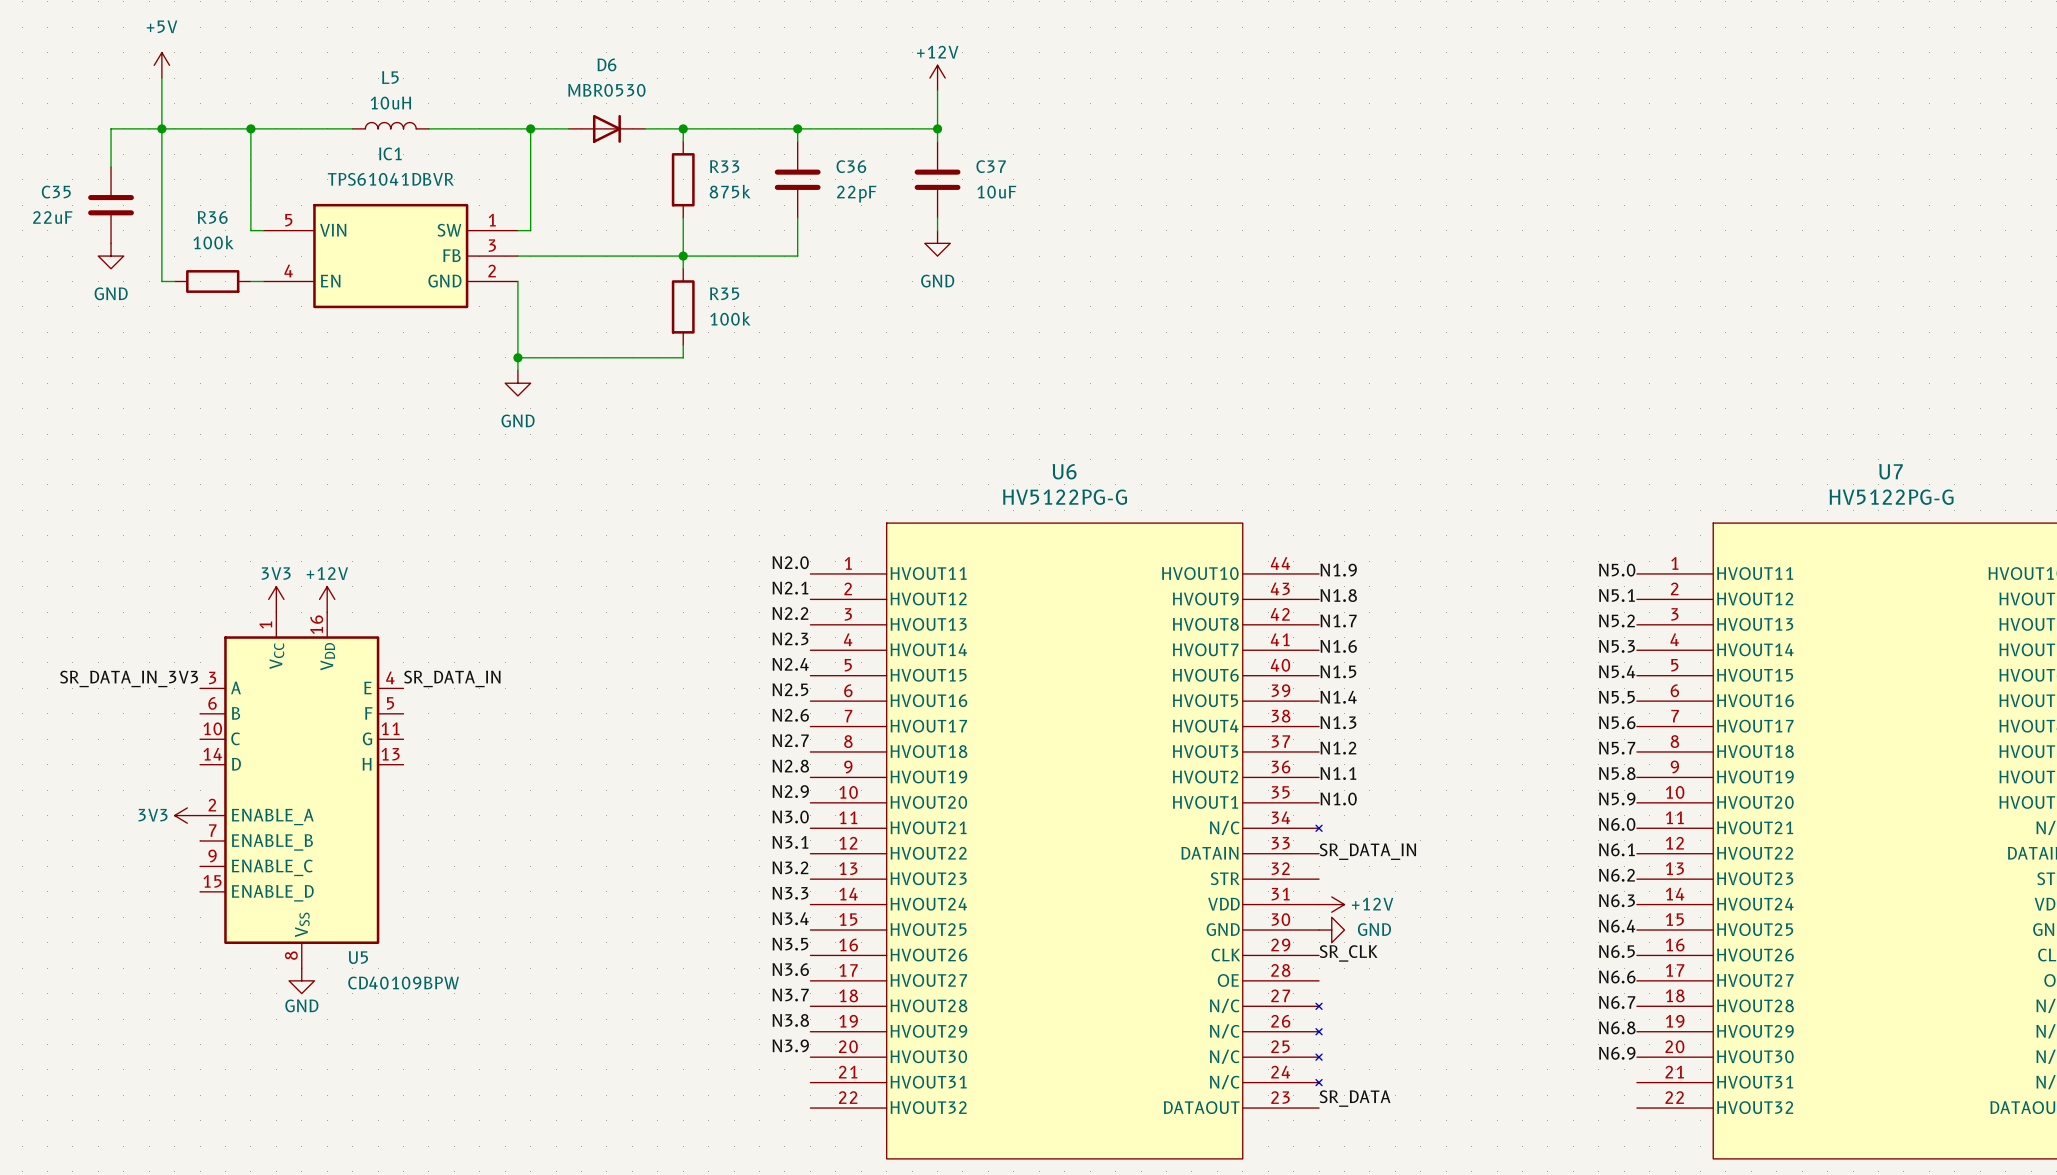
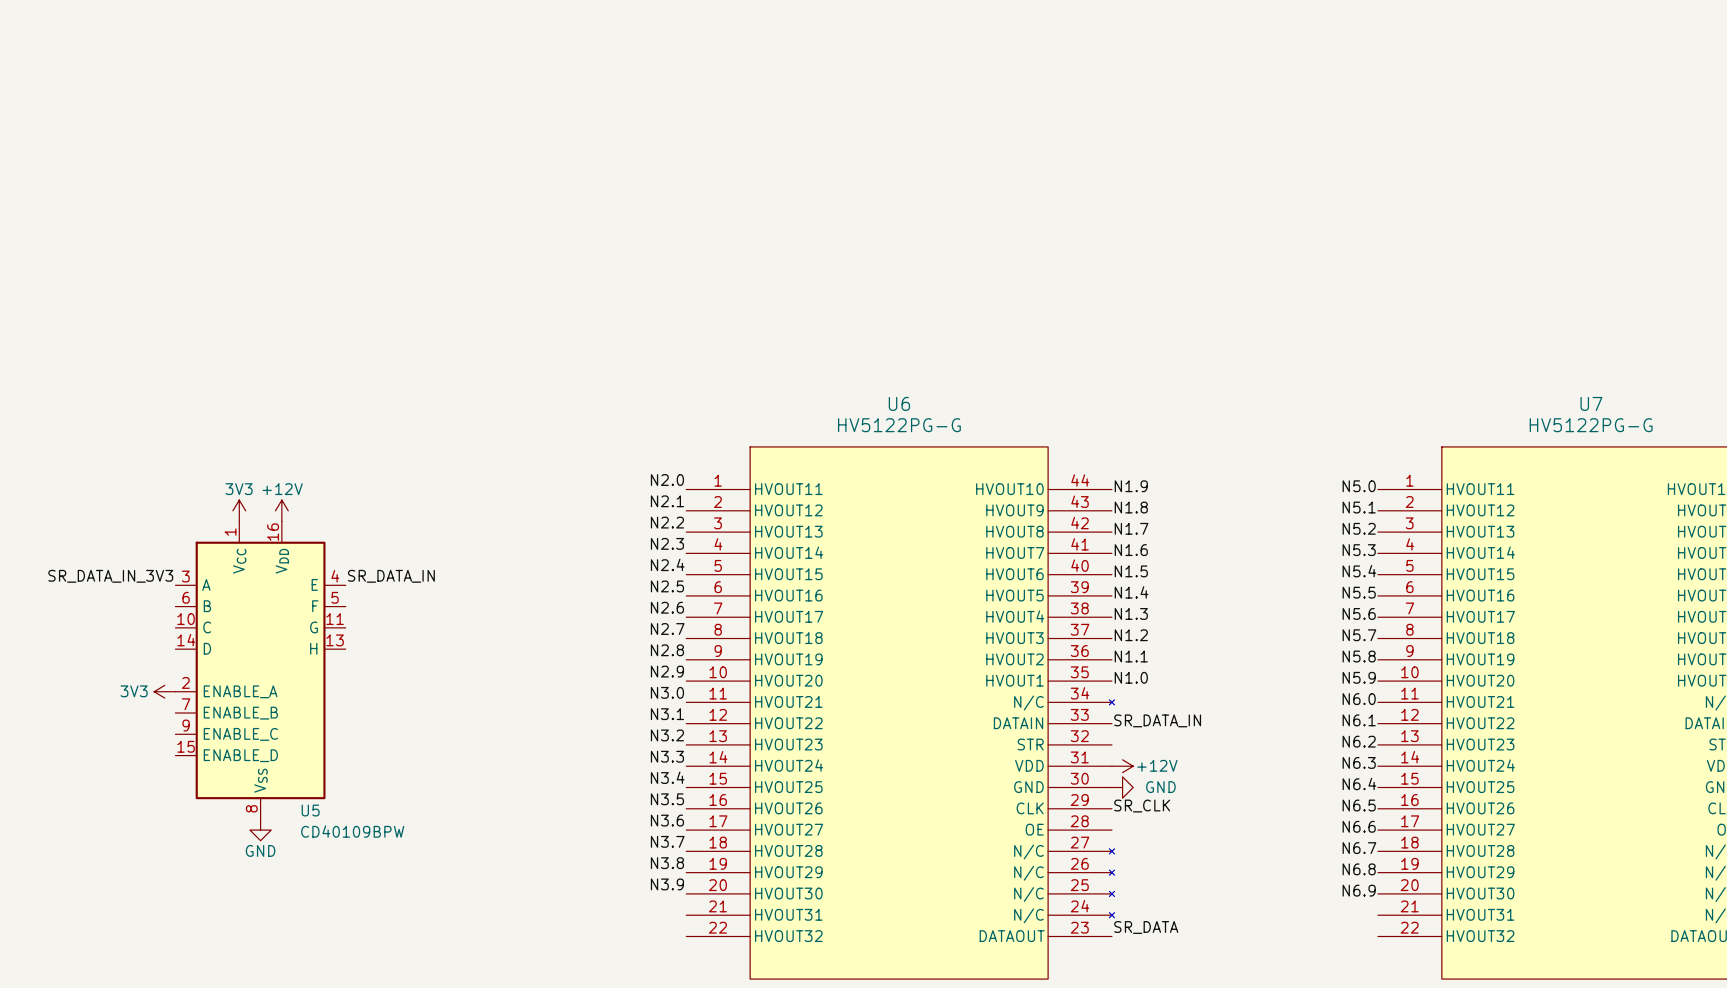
power symbol: +5V (161, 65) -> none
wire: (161, 78) (161, 281) (174, 281) -> none
power symbol: +12V (937, 78) -> none
wire: (937, 90) (937, 141) -> none
L5: 10uH (390, 125) -> none
junction: (161, 128) -> none
wire: (250, 128) (250, 230) (263, 230) -> none
junction: (250, 128) -> none
wire: (352, 128) (111, 128) (111, 167) -> none
wire: (428, 128) (568, 128) -> none
wire: (530, 128) (530, 230) (517, 230) -> none
junction: (530, 128) -> none
D6: MBR0530 (606, 128) -> none
wire: (645, 128) (937, 128) -> none
wire: (683, 128) (683, 141) -> none
junction: (683, 128) -> none
wire: (797, 128) (797, 141) -> none
junction: (797, 128) -> none
junction: (937, 128) -> none
R33: 875k (683, 179) -> none
C36: 22pF (797, 179) -> none
C37: 10uF (937, 179) -> none
C35: 22uF (111, 205) -> none
wire: (683, 217) (683, 268) -> none
wire: (797, 217) (797, 256) (517, 256) -> none
wire: (937, 217) (937, 230) -> none
power symbol: GND (937, 243) -> none
power symbol: GND (111, 256) -> none
IC1: TPS61041DBVR (390, 256) -> none
junction: (683, 256) -> none
R36: 100k (212, 281) -> none
wire: (250, 281) (263, 281) -> none
wire: (517, 281) (517, 370) -> none
R35: 100k (683, 306) -> none
wire: (683, 345) (683, 357) (517, 357) -> none
junction: (517, 357) -> none
power symbol: GND (517, 383) -> none

